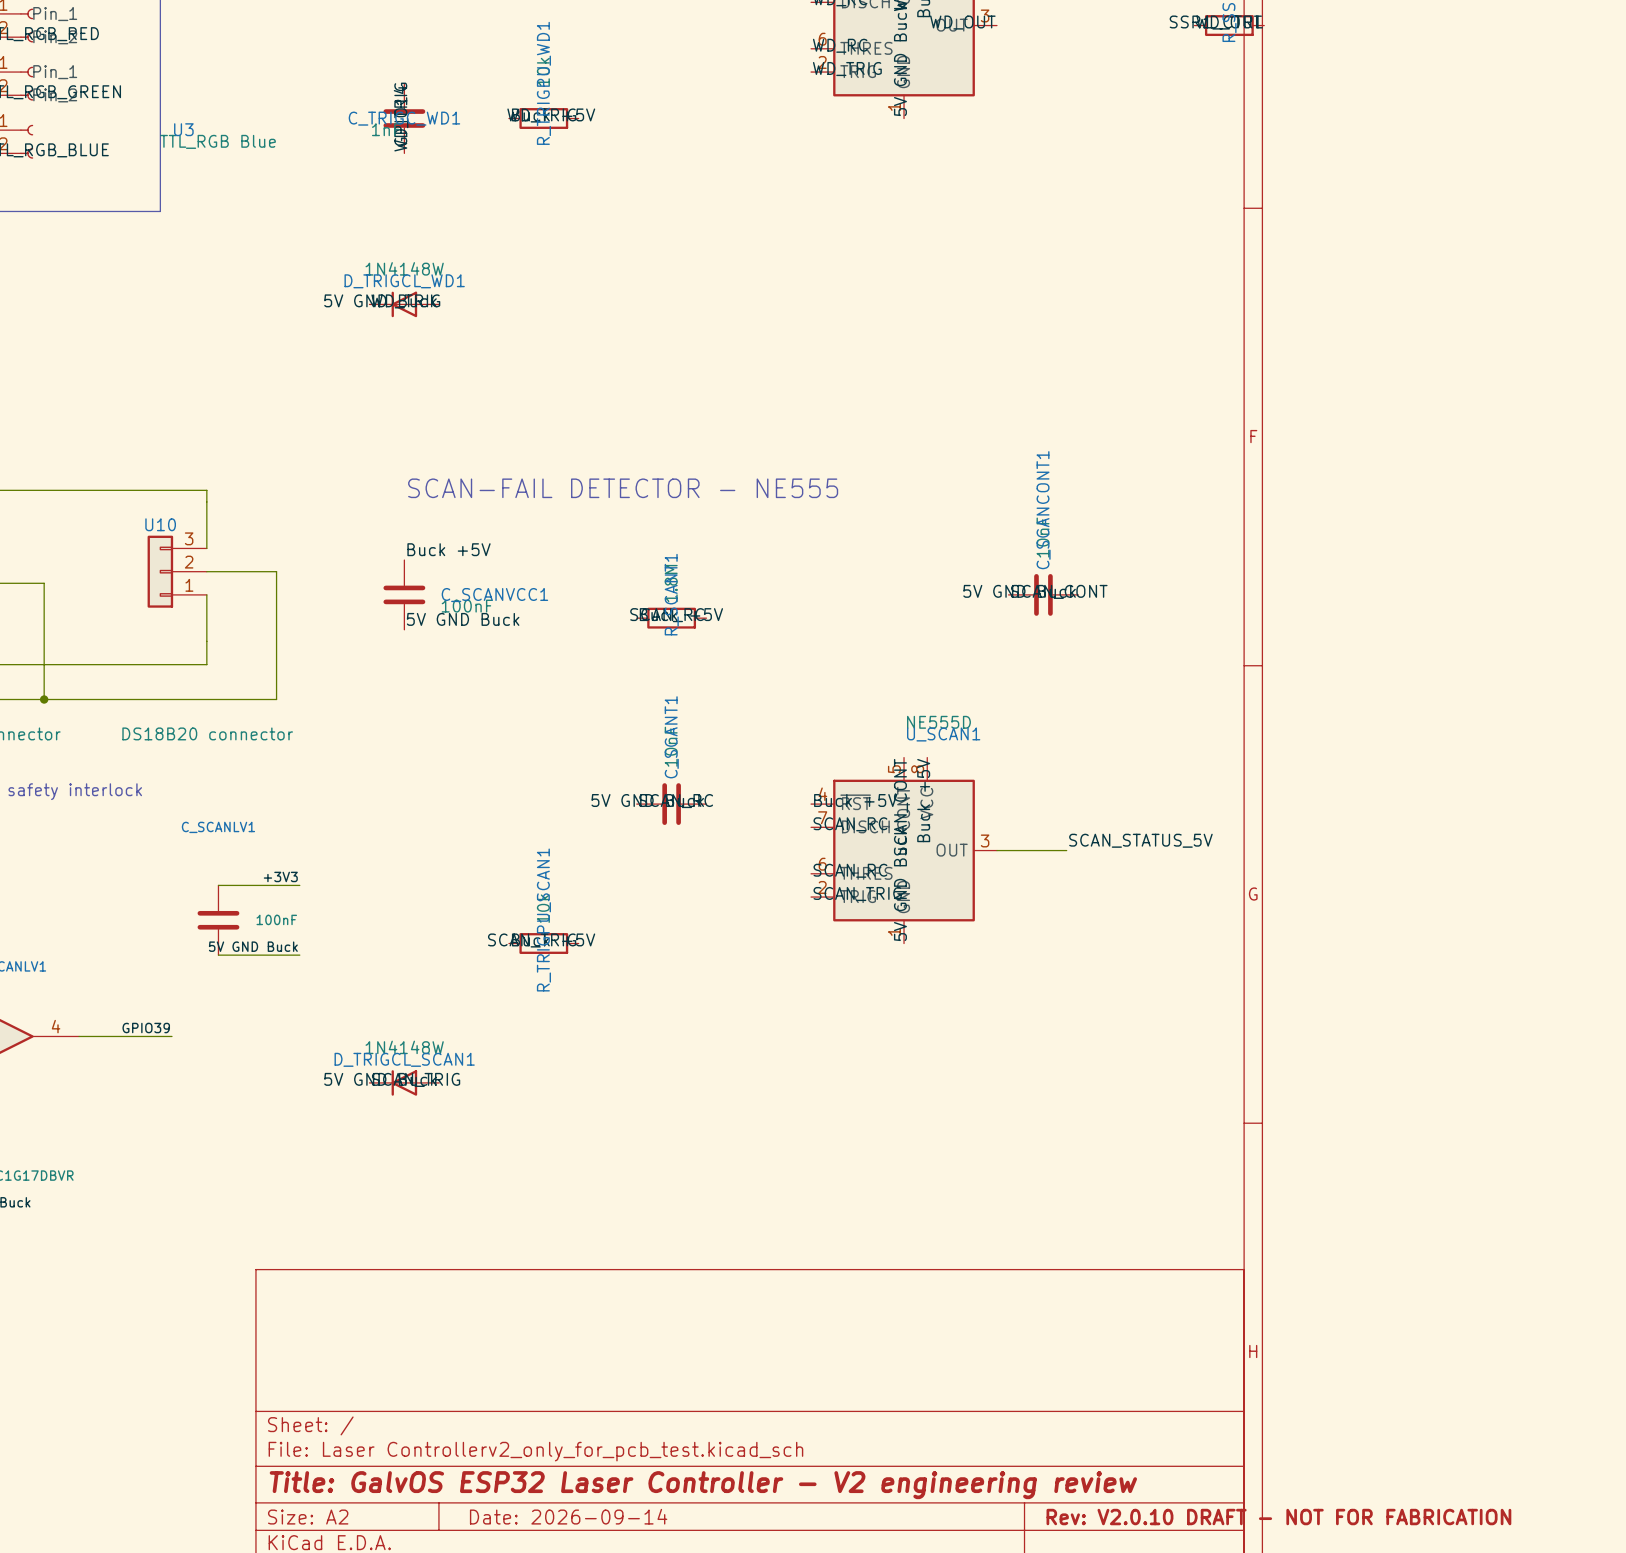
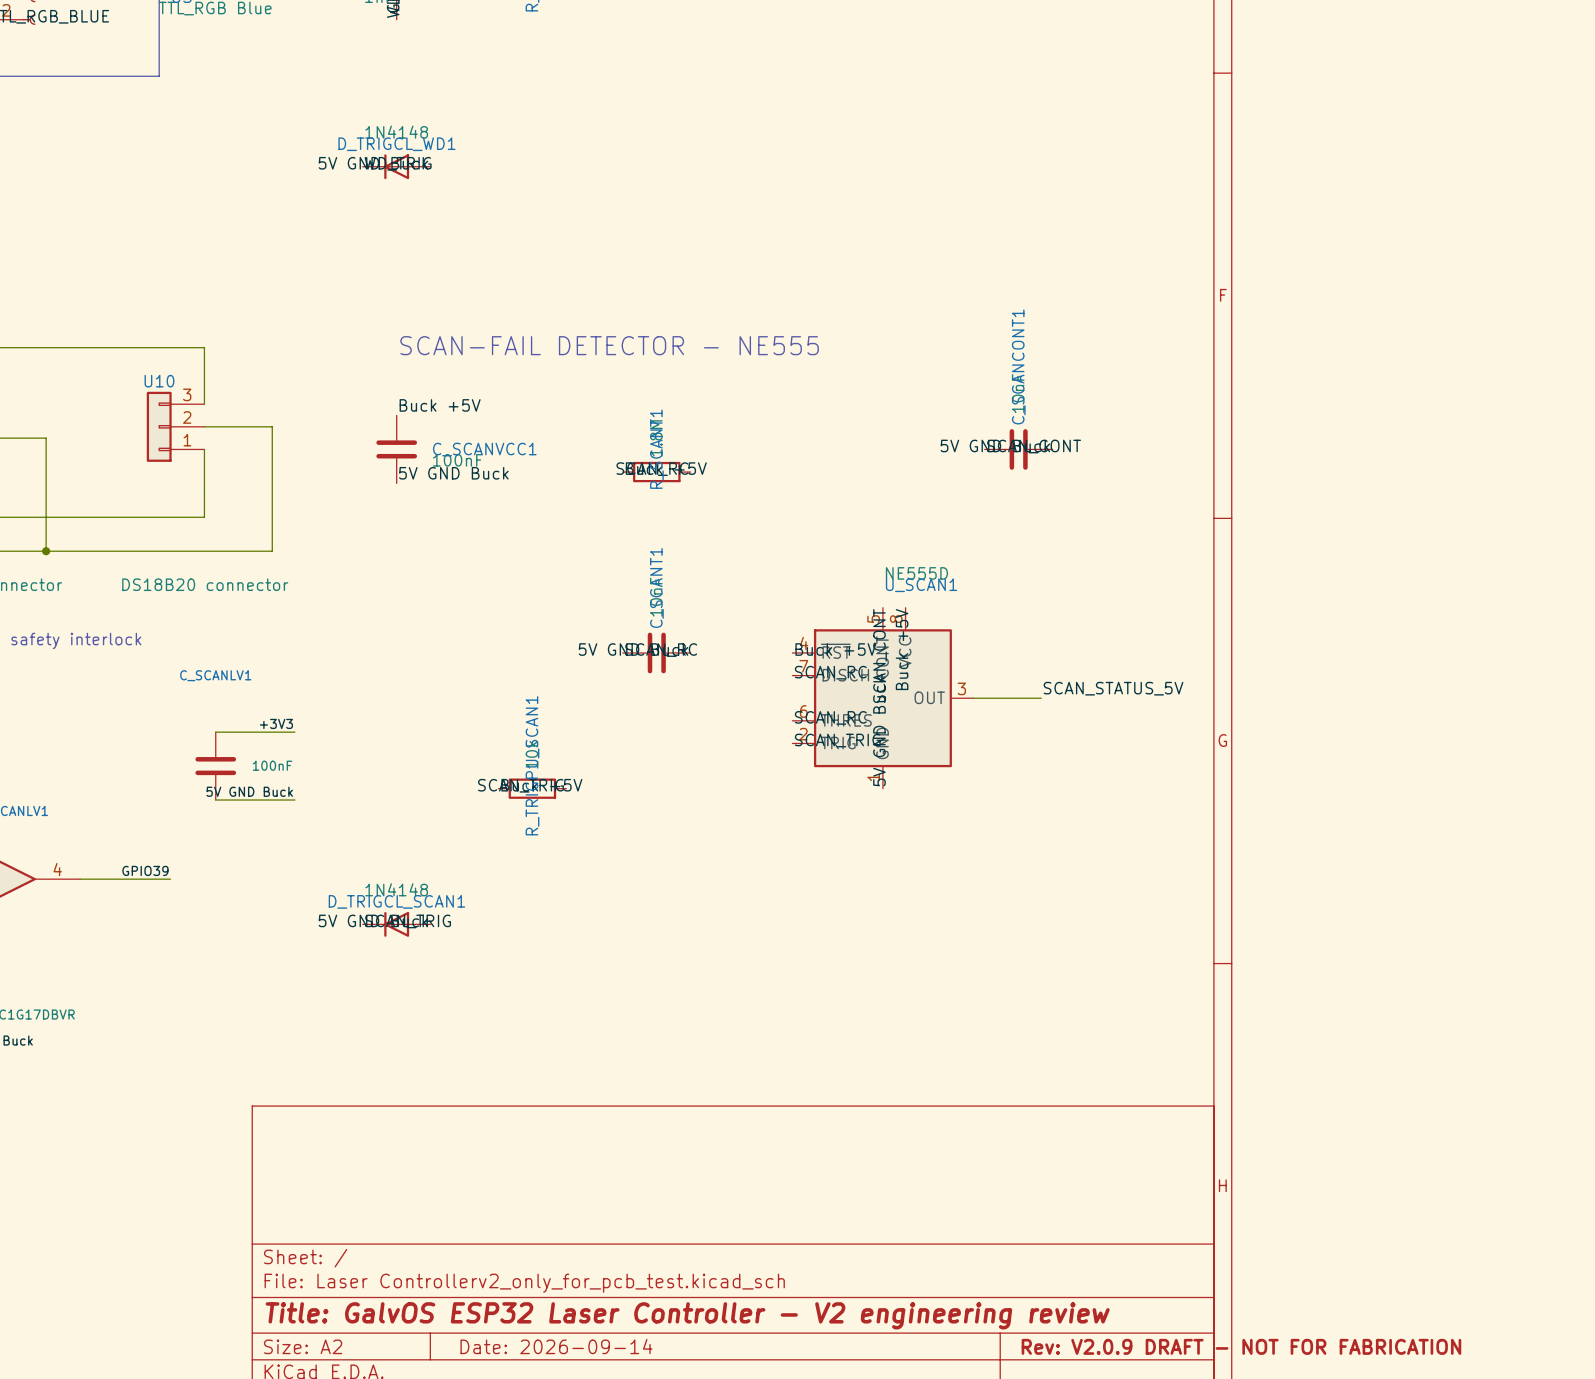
D_TRIGCL_WD1 value: 1N4148W (404, 268) -> 1N4148 (396, 132)
D_TRIGCL_SCAN1 value: 1N4148W (404, 1047) -> 1N4148 (396, 889)
title block: Rev: V2.0.10 DRAFT - NOT FOR FABRICATION (1278, 1517) -> Rev: V2.0.9 DRAFT - NOT FOR FABRICATION (1241, 1346)

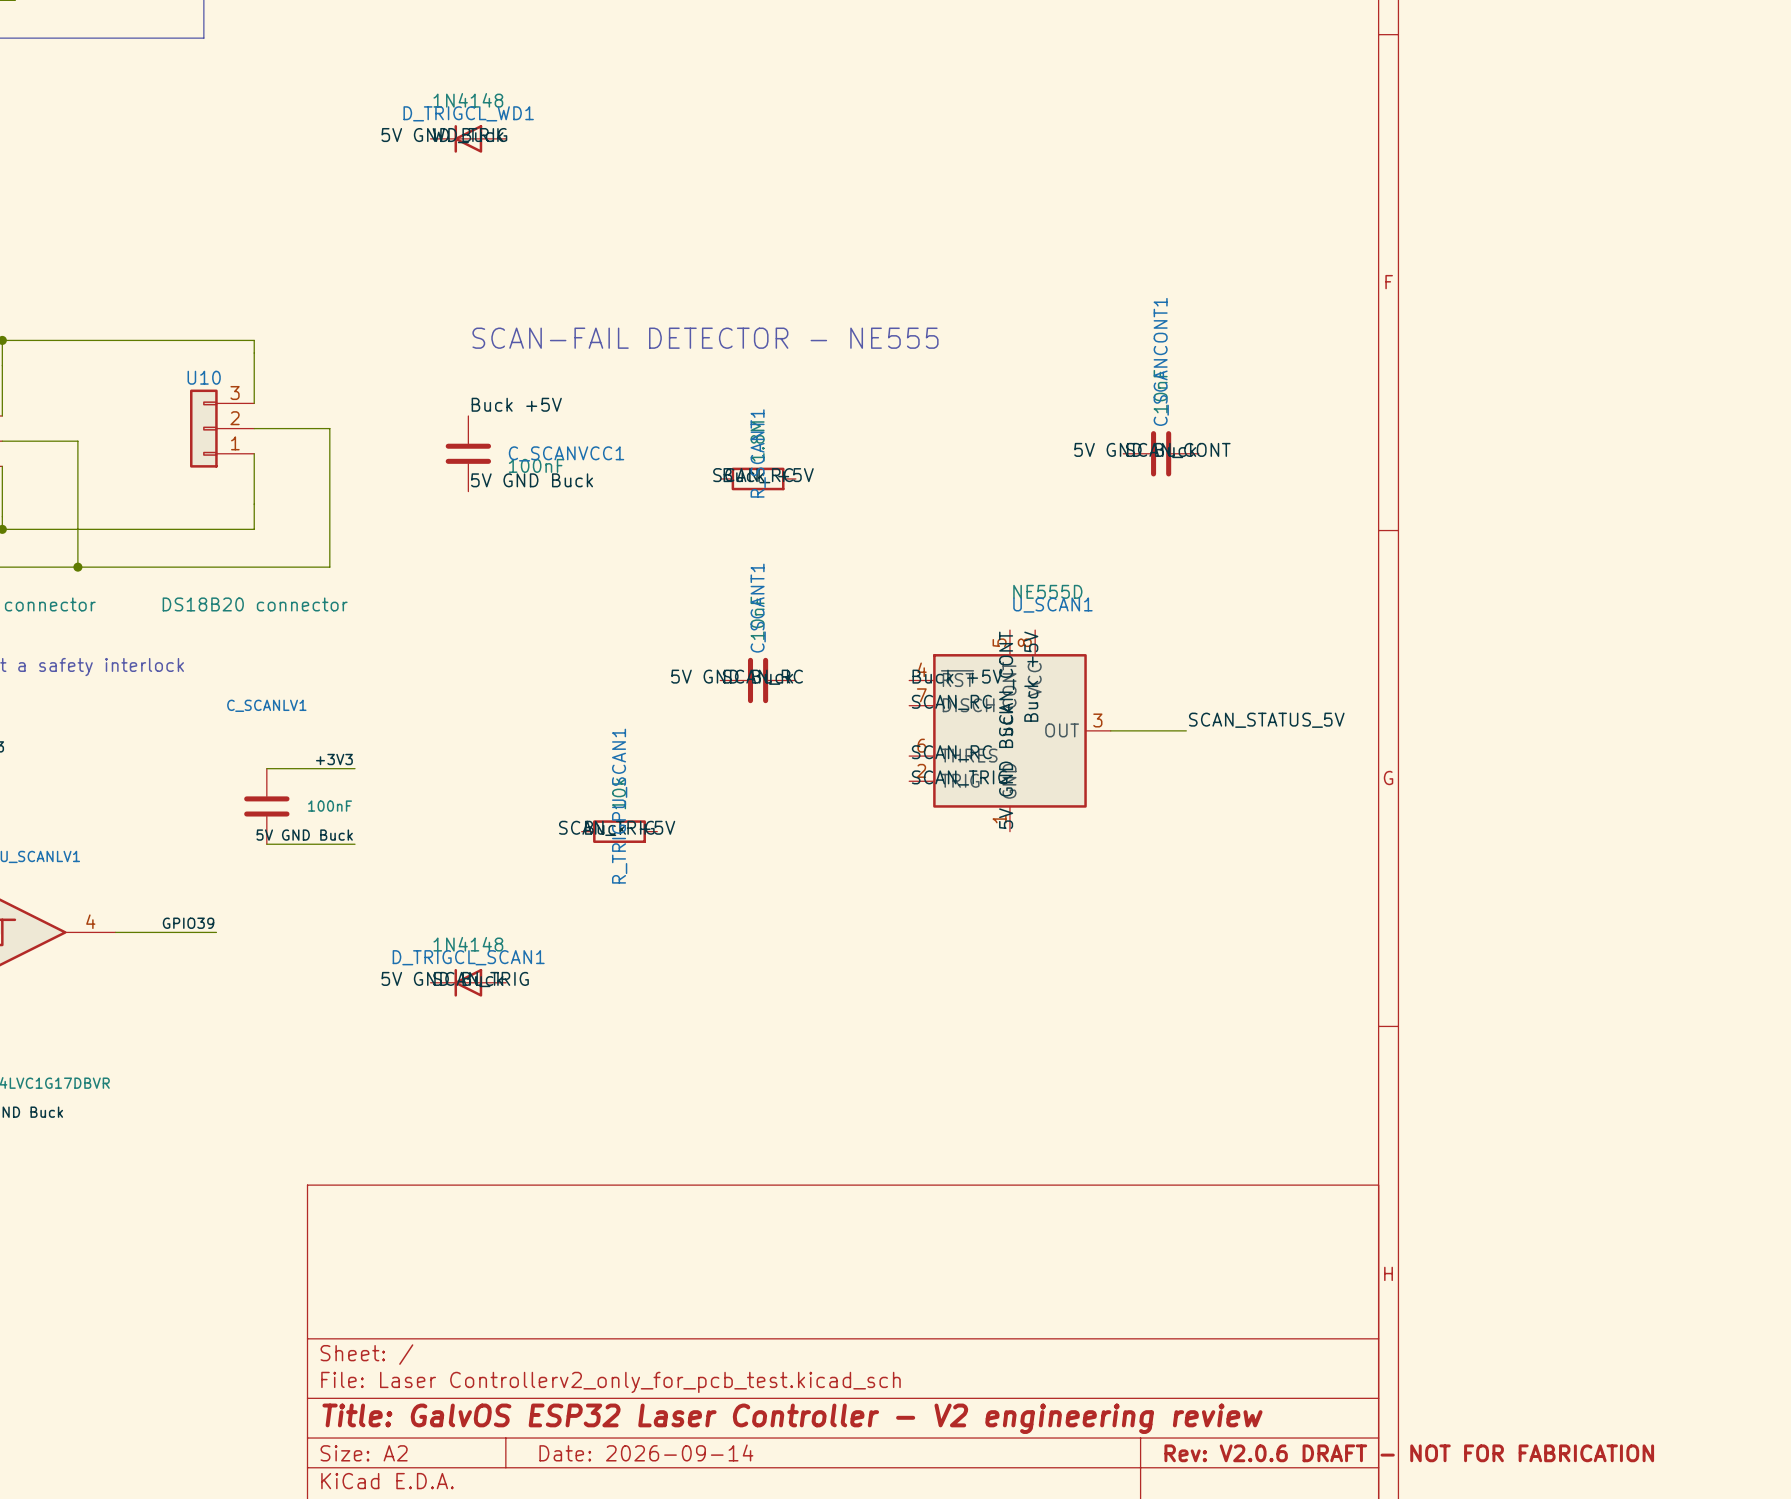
title block: Rev: V2.0.9 DRAFT - NOT FOR FABRICATION (1241, 1346) -> Rev: V2.0.6 DRAFT - NOT FOR FABRICATION (1409, 1453)

